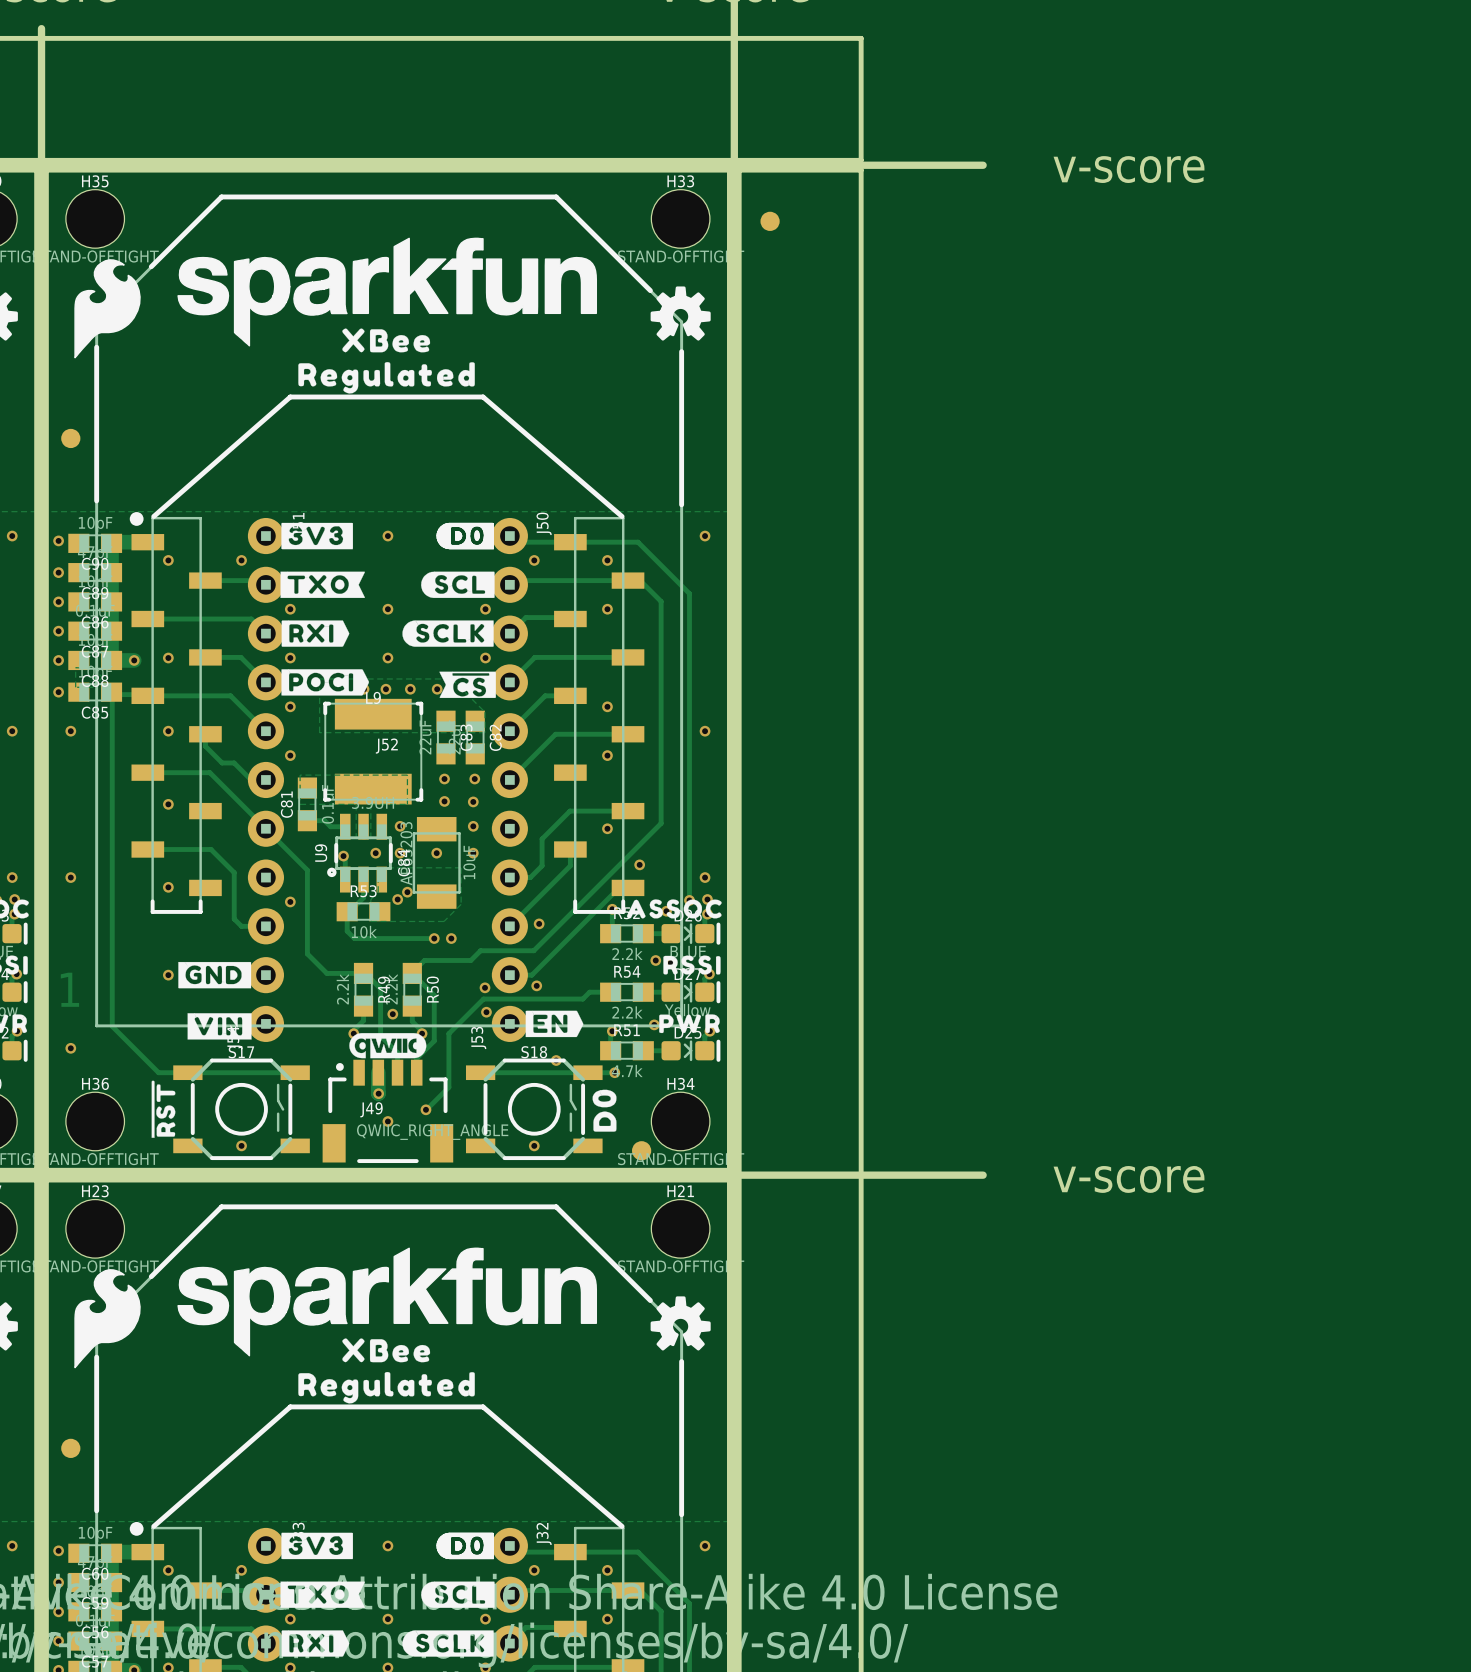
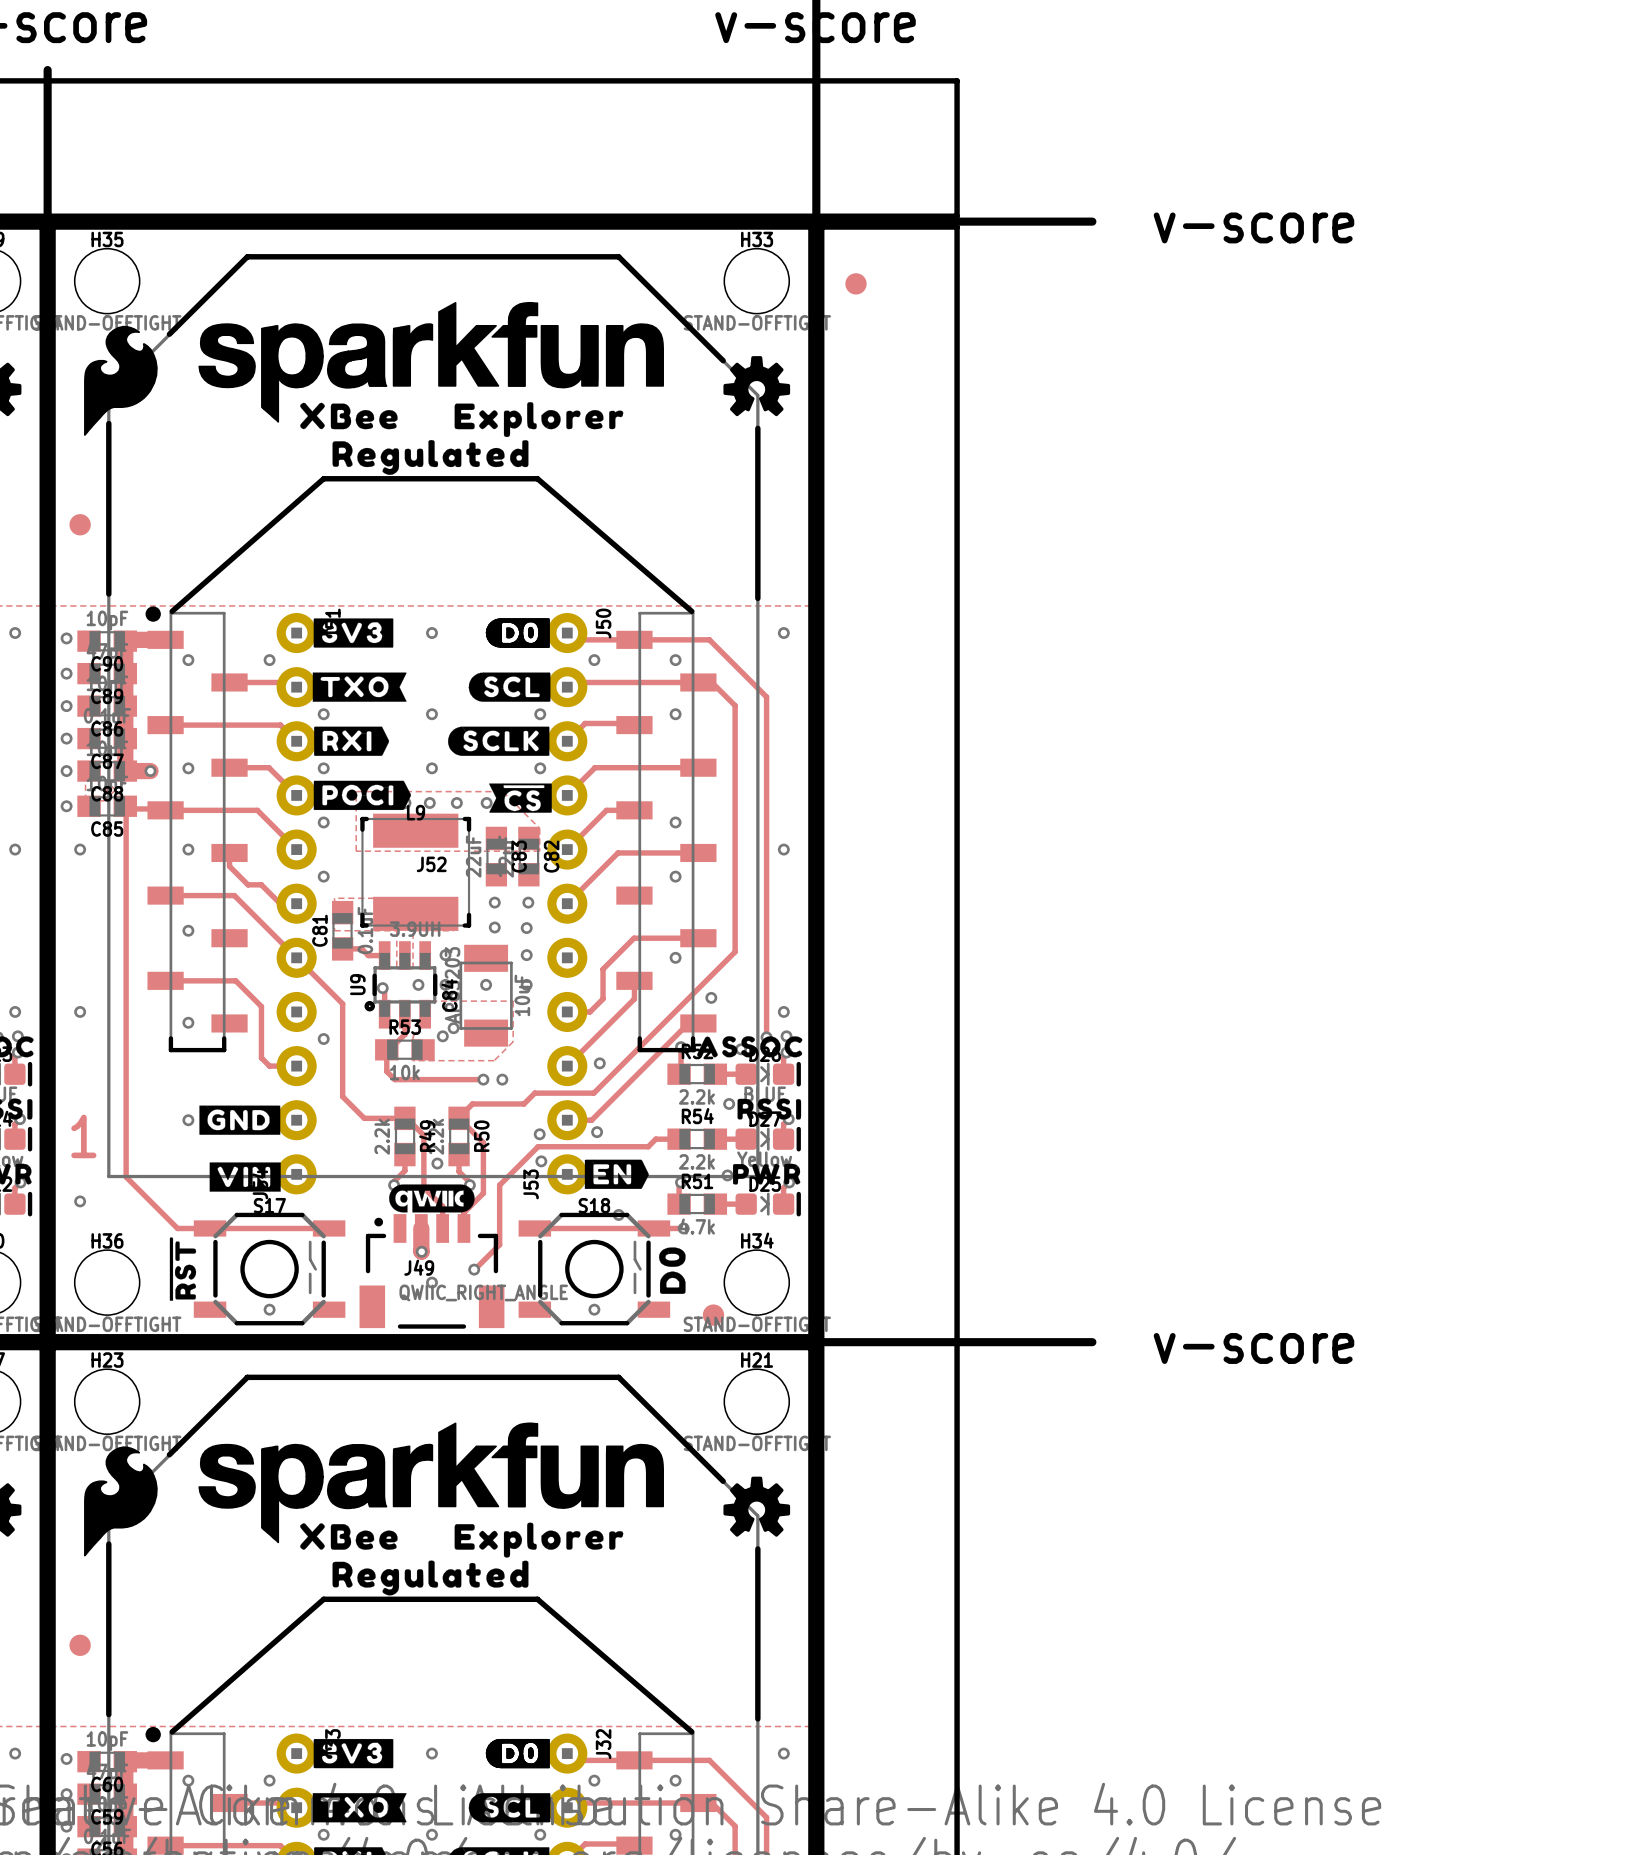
drawing: none -> [454, 402, 624, 438]
drawing position: (386, 340) -> (348, 415)
drawing: none -> [454, 1522, 624, 1558]
drawing position: (386, 1350) -> (348, 1536)

